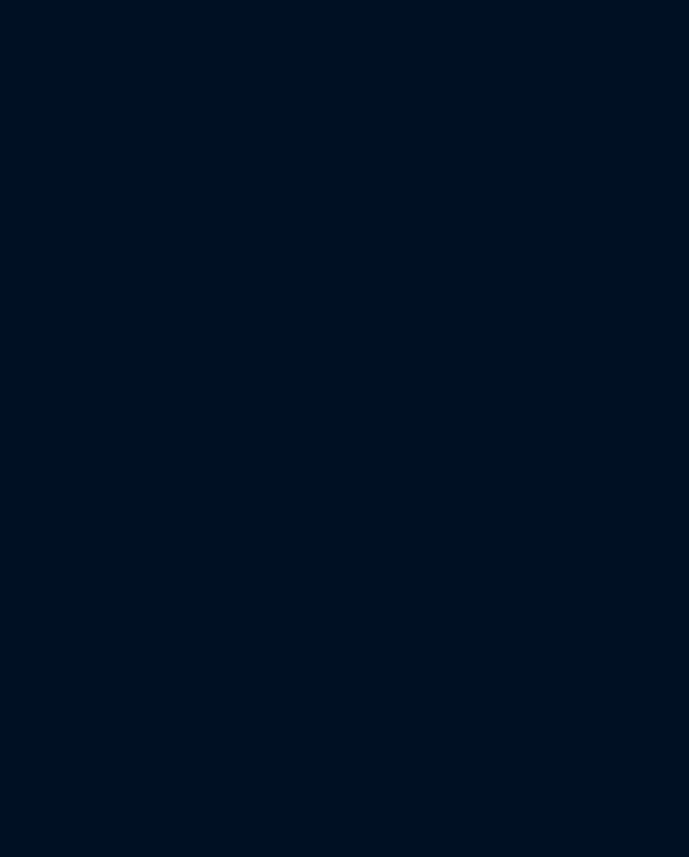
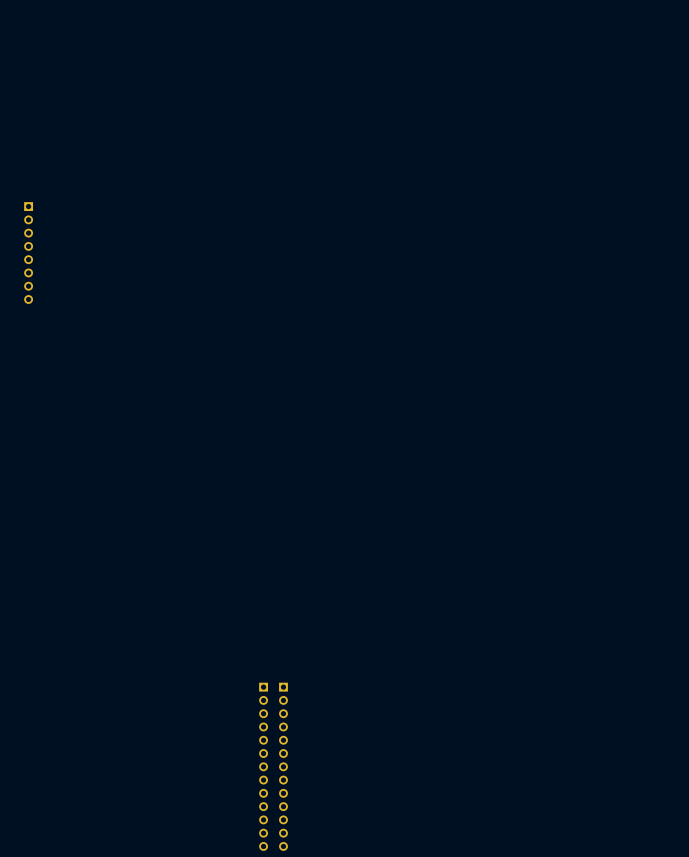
part: none -> (28, 253)
part: none -> (263, 766)
part: none -> (283, 766)

